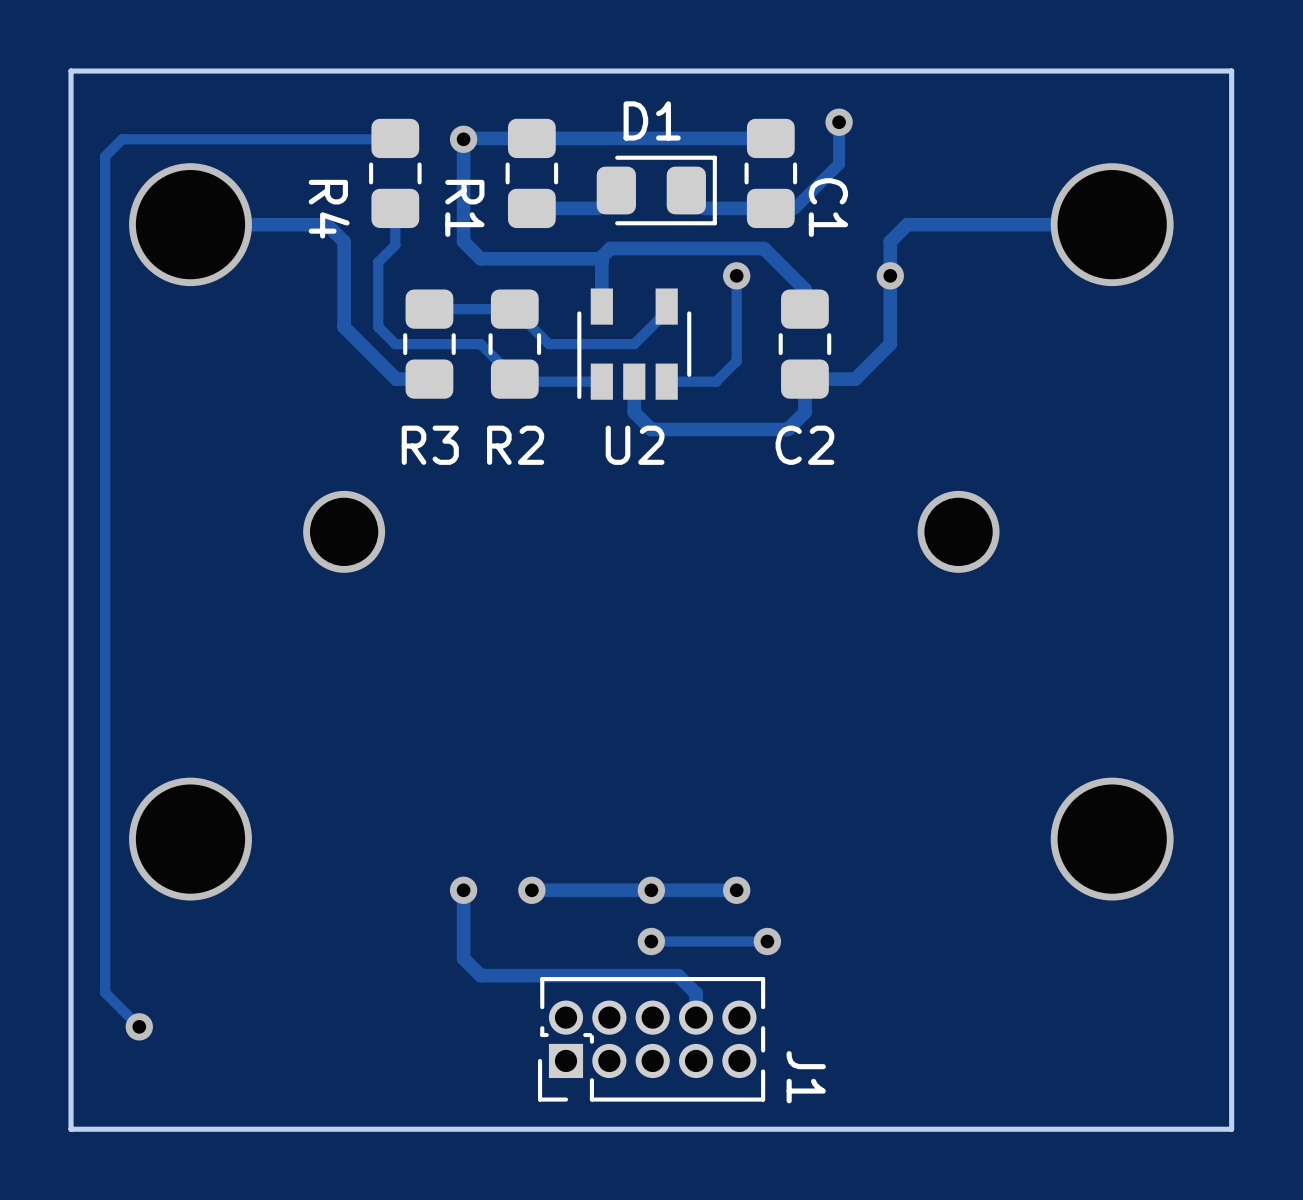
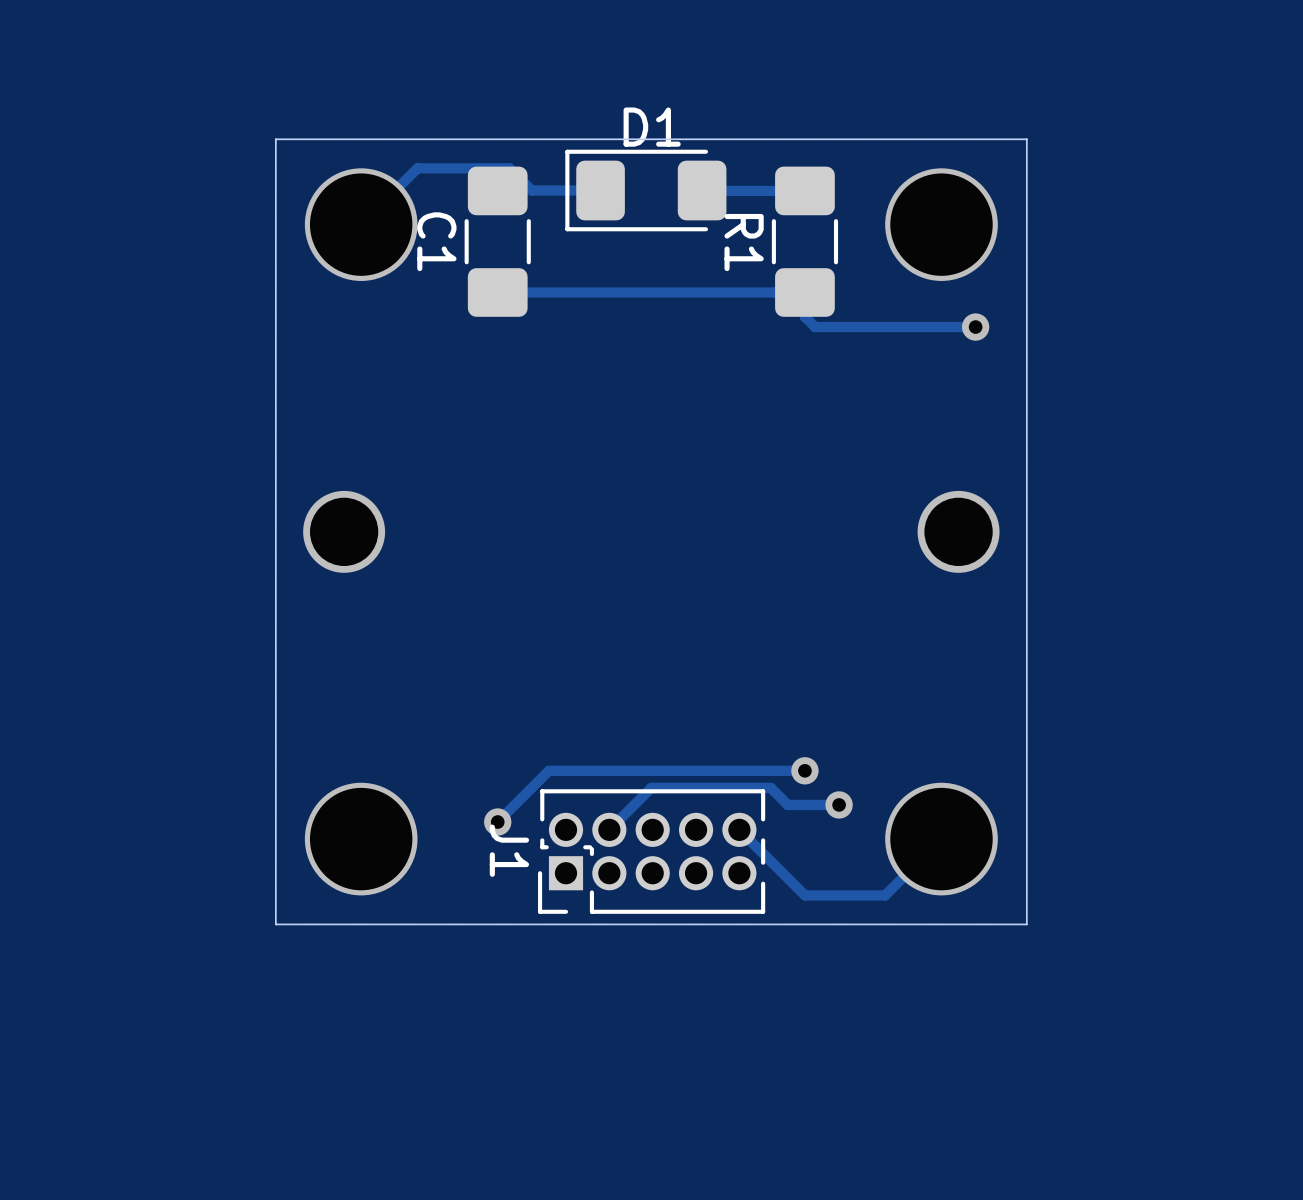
board edge: (1231, 71) (1231, 1129) (71, 1129) (71, 71) (1231, 71) -> none
R1 footprint: [505, 118, 559, 229] -> [771, 166, 839, 317]
C1 footprint: [744, 118, 798, 229] -> [464, 166, 531, 317]
track: (839, 122) (839, 164) (794, 208) (704, 208) (686, 190) -> none
via: (839, 122) -> none
track: (770, 138) (463, 139) (463, 241) (480, 258) (600, 258) -> none
track: (379, 139) (122, 139) (105, 156) (105, 992) (139, 1026) -> none
via: (463, 139) -> none
board edge: none -> (1026, 139) (1026, 924) (275, 924) (275, 139) (1026, 139)
D1 footprint: [596, 155, 717, 226] -> [565, 149, 727, 232]
R4: (395, 173) -> none
track: none -> (600, 190) (531, 190) (509, 168) (417, 168) (361, 224)
track: (616, 190) (598, 208) (531, 208) -> none
track: none -> (804, 190) (702, 190)
track: (395, 207) (395, 245) (378, 262) (378, 327) (395, 344) (480, 344) (517, 381) (601, 381) -> none
C1 name position: C1 (828, 207) -> C1 (436, 241)
track: (190, 224) (327, 224) (344, 241) (344, 327) (396, 379) (429, 379) -> none
via: (190, 224) -> none
via: none -> (361, 224)
via: none -> (941, 224)
track: (1112, 224) (907, 224) (890, 241) (890, 344) (855, 379) (804, 379) (804, 412) (787, 429) (651, 429) (634, 412) (634, 381) -> none
via: (1112, 224) -> none
track: (600, 258) (610, 248) (763, 248) (804, 289) (804, 292) -> (497, 292) (804, 292)
track: (600, 258) (601, 260) (601, 306) -> none
track: (736, 275) (736, 361) (716, 381) (666, 381) -> none
via: (736, 275) -> none
via position: (890, 275) -> (975, 327)
track: (666, 306) (666, 311) (634, 344) (548, 344) (514, 309) (429, 309) -> none
track: none -> (804, 309) (804, 316) (815, 327) (975, 327)
R3: (429, 344) -> none
R2: (514, 344) -> none
U2: (634, 344) -> none
C2: (804, 344) -> none
track: none -> (804, 770) (548, 770) (497, 822)
via: none -> (804, 770)
track: none -> (839, 804) (787, 804) (770, 787) (651, 787) (609, 829)
via: none -> (839, 804)
via: none -> (497, 822)
track: none -> (739, 829) (804, 895) (885, 895) (941, 839)
via: (190, 839) -> none
via: none -> (361, 839)
via: none -> (941, 839)
via: (1112, 839) -> none
track: (463, 890) (463, 958) (480, 975) (678, 975) (696, 993) (696, 1017) -> none
via: (463, 890) -> none
via: (531, 890) -> none
via: (651, 890) -> none
track: (736, 890) (531, 890) -> none
via: (736, 890) -> none
via: (651, 941) -> none
track: (767, 941) (651, 941) -> none
via: (767, 941) -> none
via: (139, 1026) -> none
J1 position: (651, 1039) -> (651, 851)
J1 name position: J1 (806, 1077) -> J1 (509, 850)

